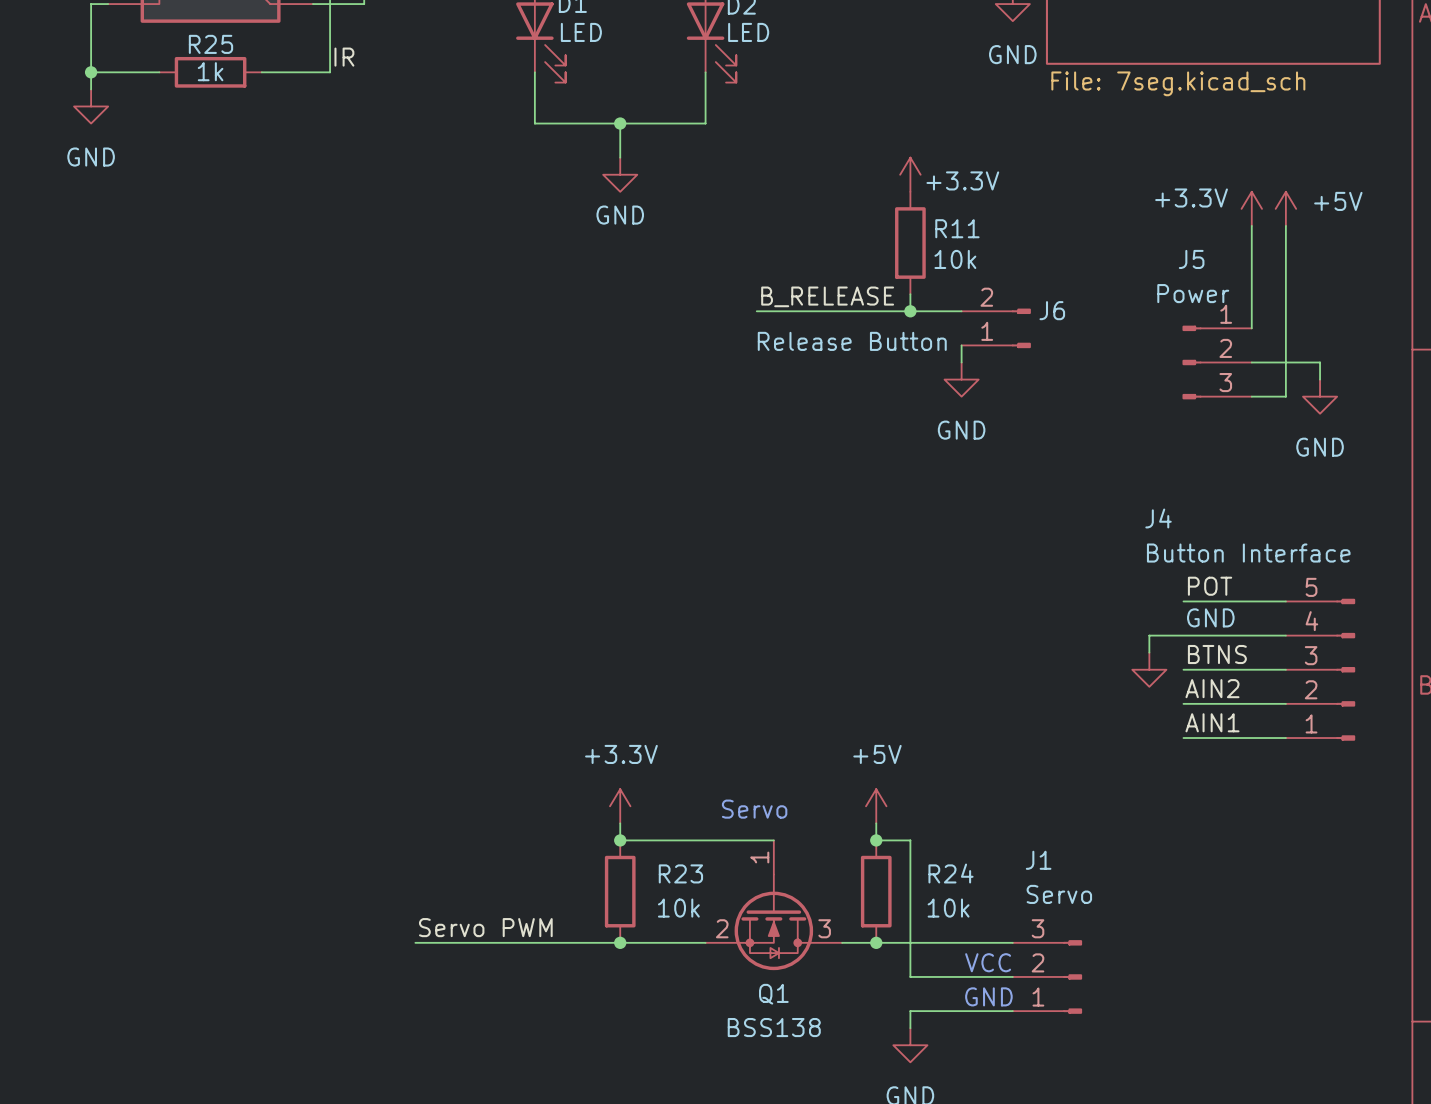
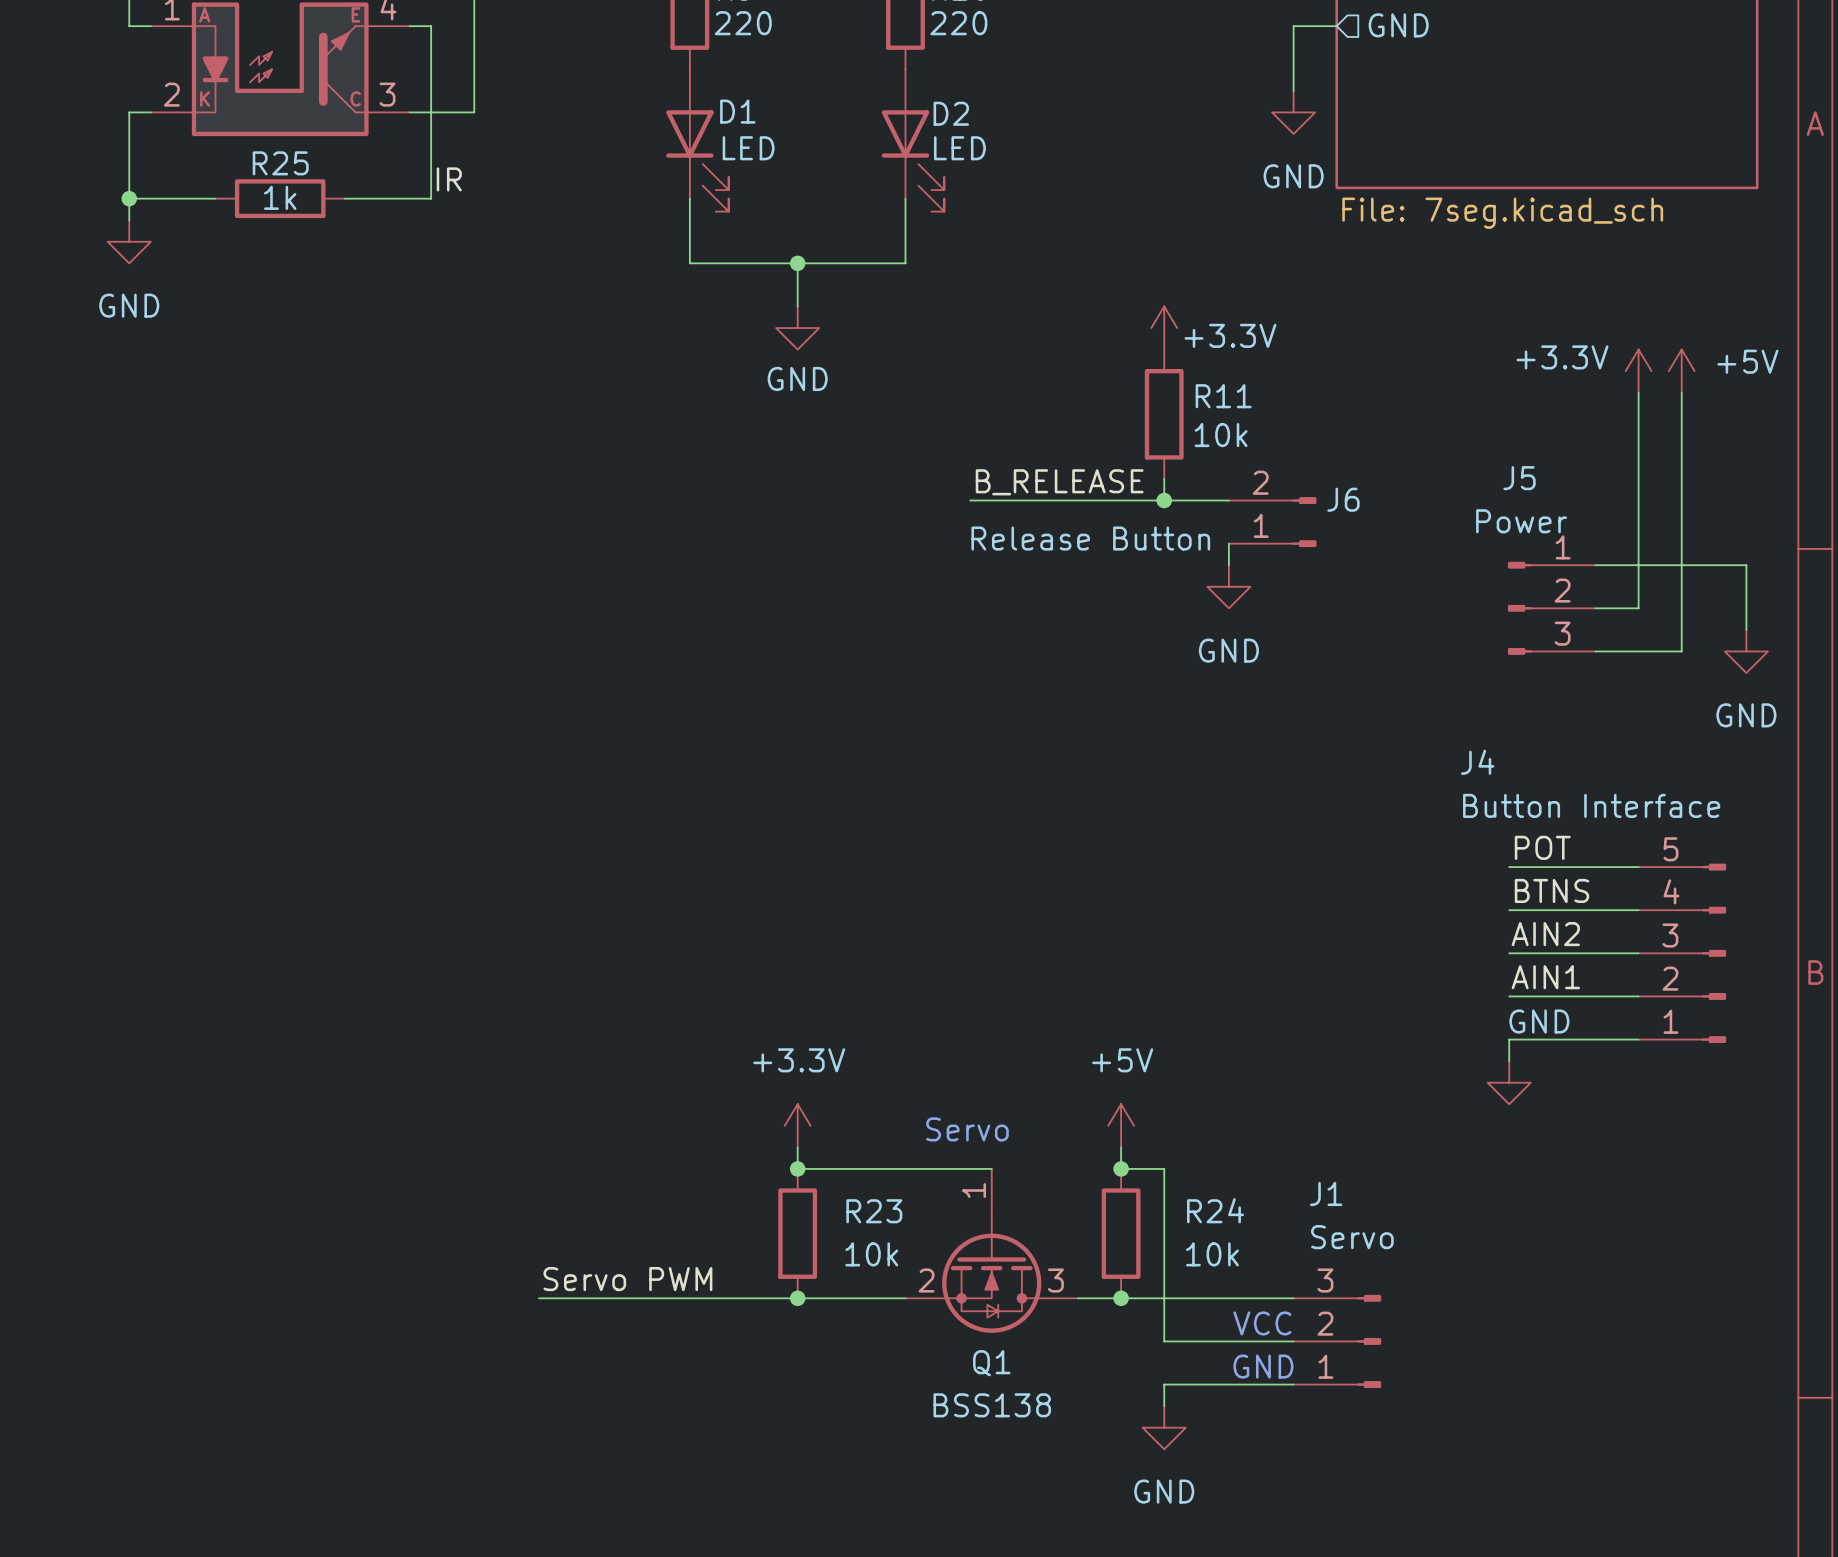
power symbol: +3.3V (1251, 208) -> none
power symbol: +5V (1285, 208) -> +3.3V (1638, 371)
power symbol: none -> +5V (1681, 371)
wire: (1251, 225) (1251, 328) -> none
wire: none -> (1681, 392) (1681, 565) (1746, 565) (1746, 629)
J5 position: (1217, 362) -> (1551, 608)
wire: none -> (1681, 586) (1681, 651) (1595, 651)
power symbol position: GND (1320, 396) -> GND (1746, 651)
power symbol text position: GND (1210, 617) -> GND (1539, 1021)
label: none -> BTNS (1552, 890)
wire: (1183, 635) (1149, 635) (1149, 652) -> none
label: BTNS (1217, 654) -> AIN2 (1545, 934)
power symbol position: GND (1149, 669) -> GND (1509, 1082)
label: AIN2 (1212, 688) -> AIN1 (1545, 977)
label: AIN1 (1212, 722) -> none
wire: none -> (1509, 1039) (1509, 1061)

